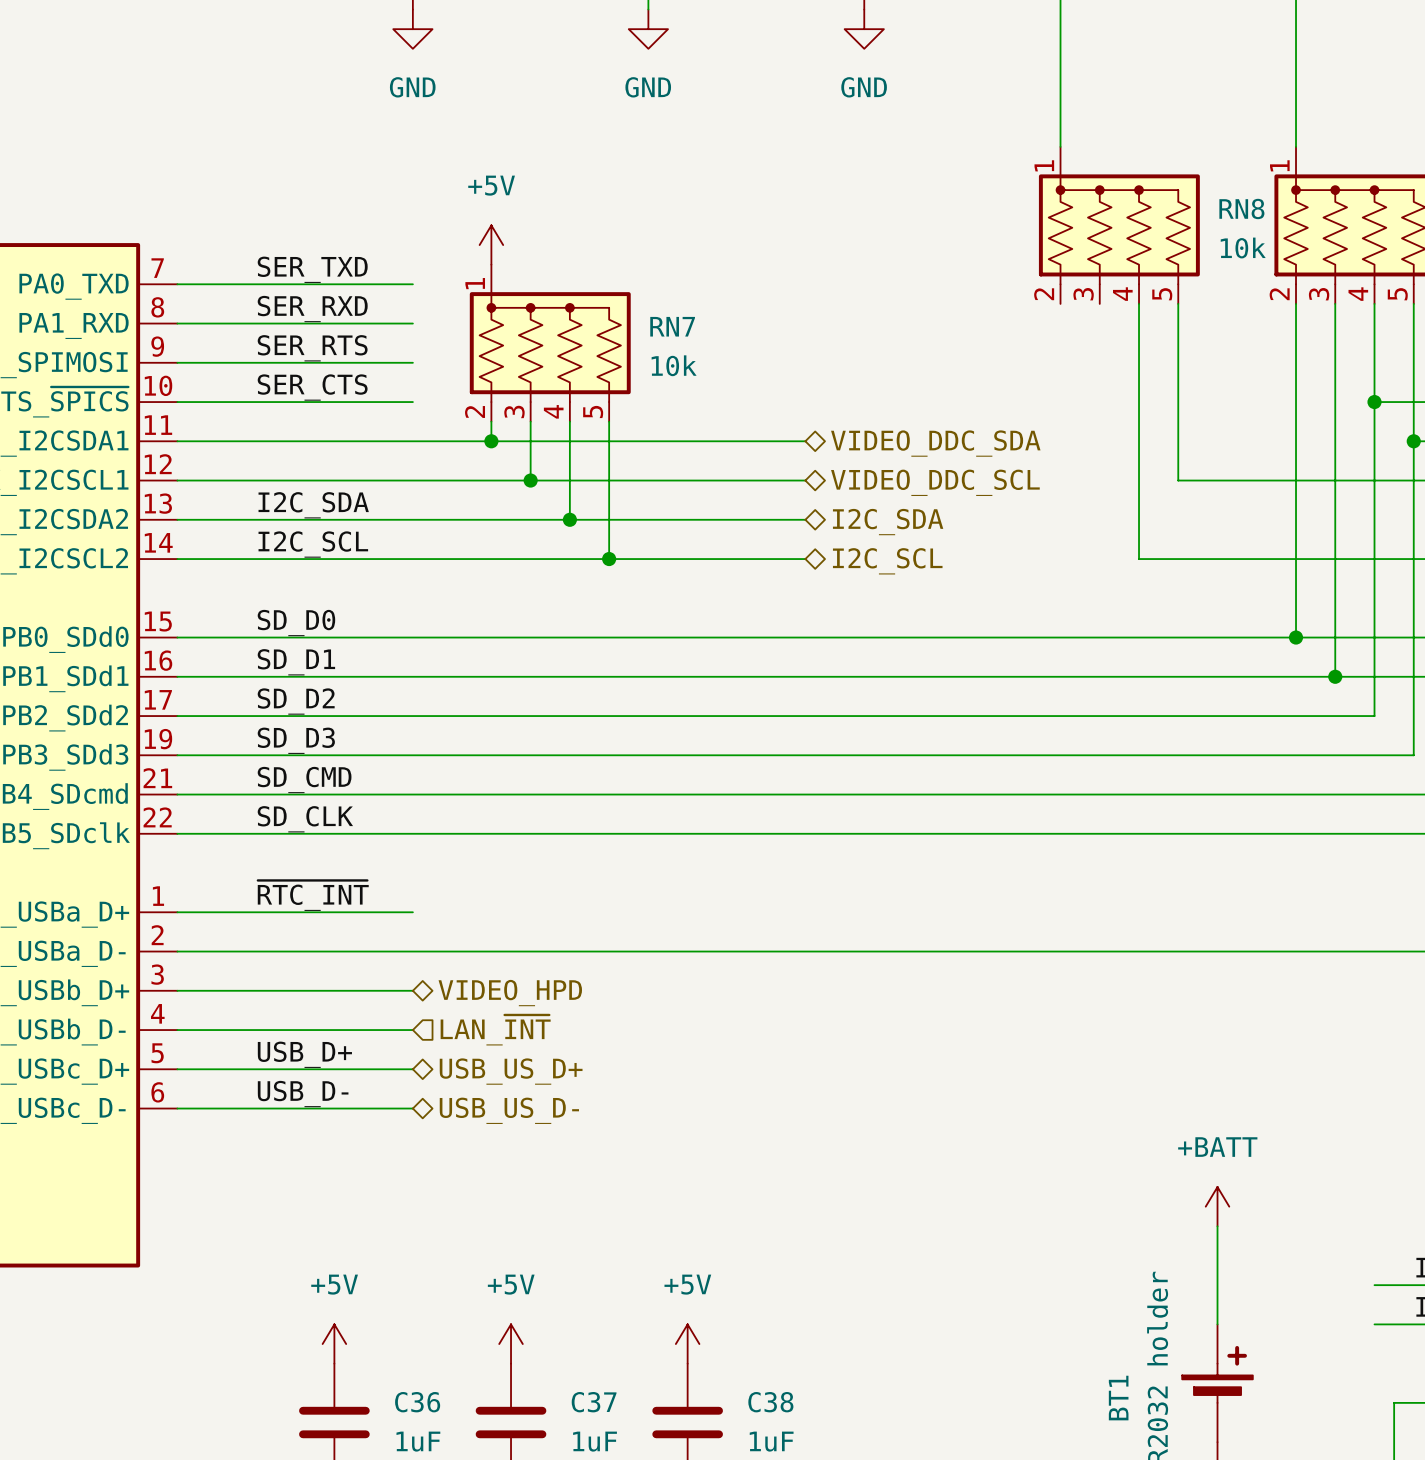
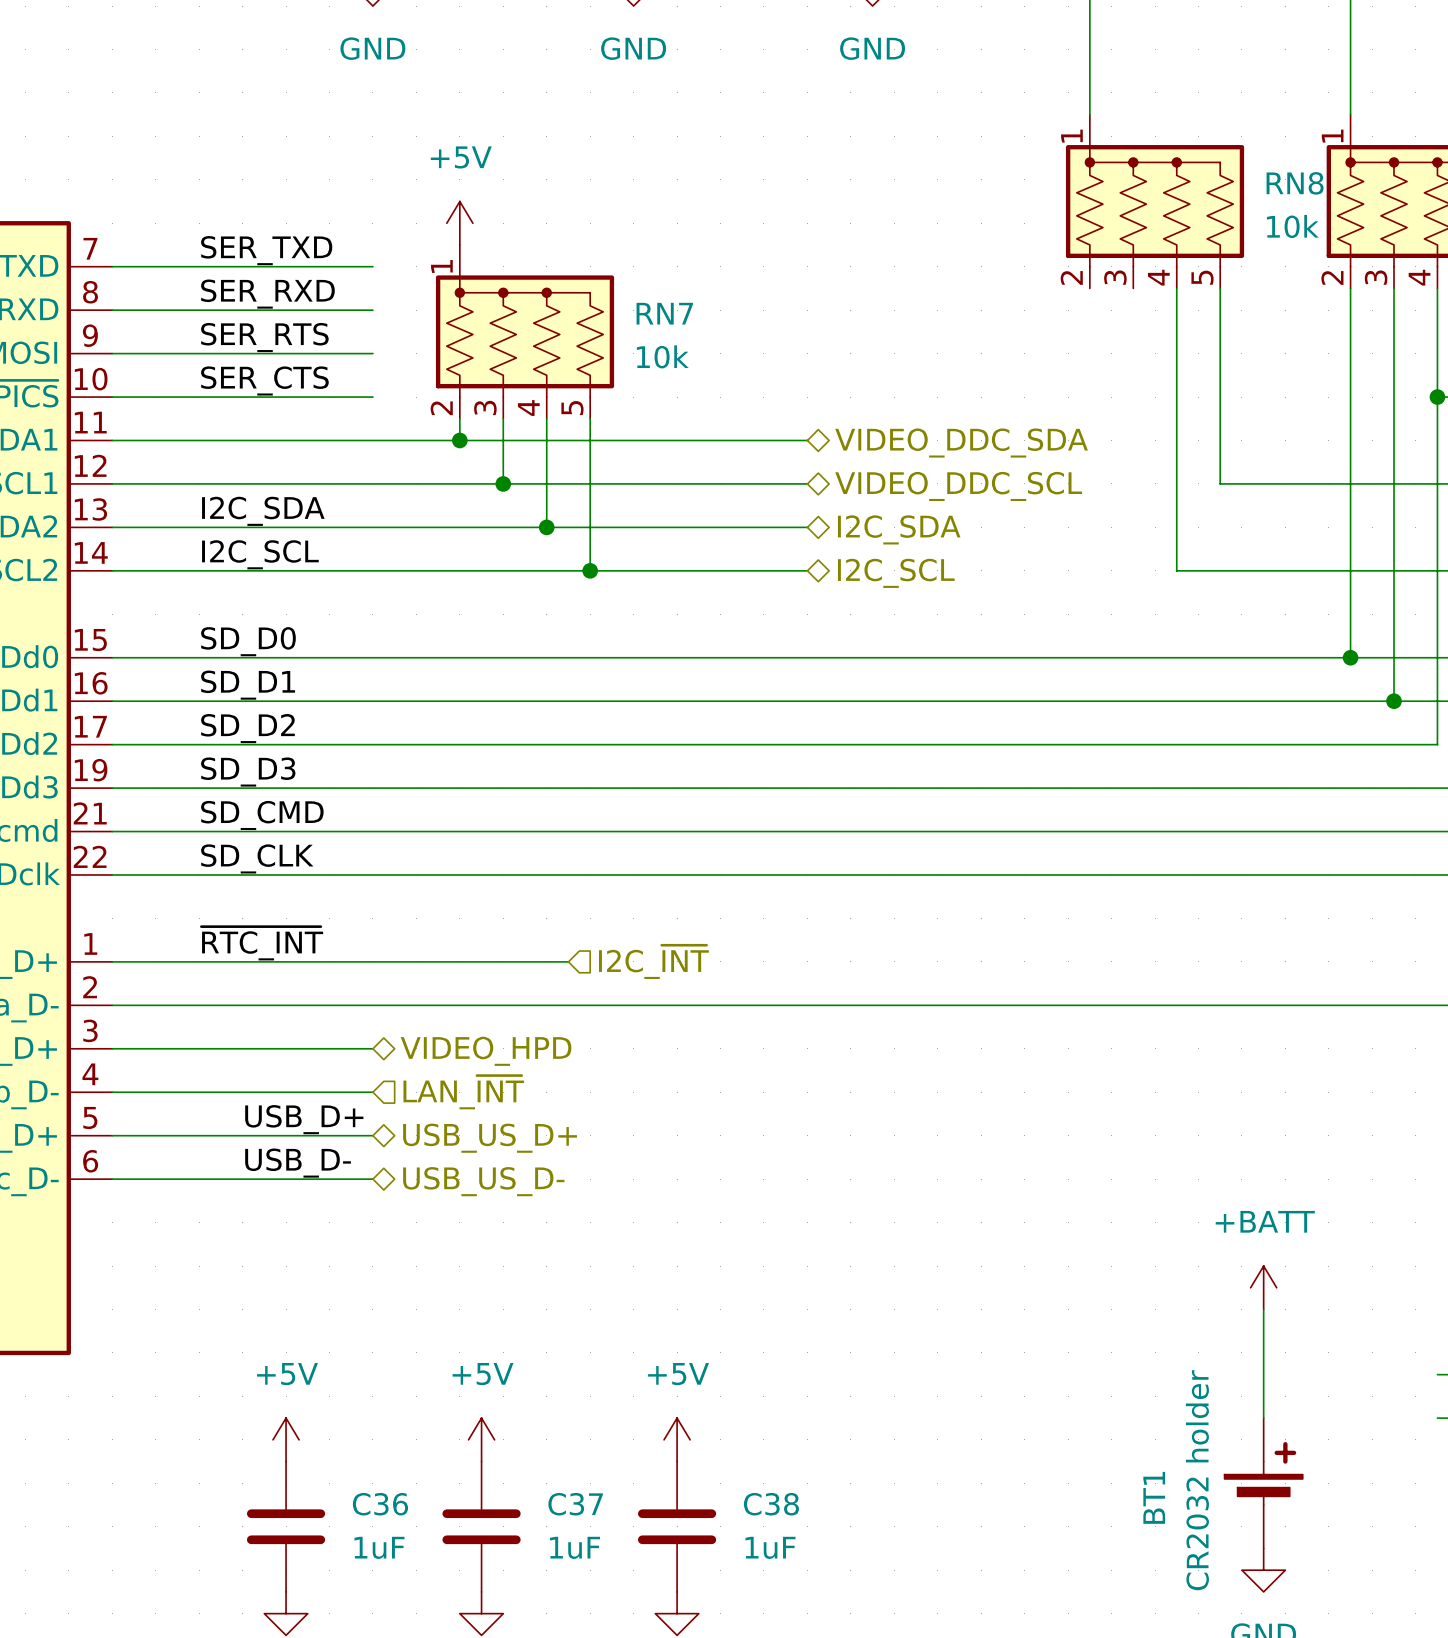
wire: none -> (372, 961) (568, 961)
hierarchical label: none -> I2C_~{INT} (653, 962)
label position: USB_D+ (304, 1054) -> USB_D+ (304, 1119)
label position: USB_D- (303, 1094) -> USB_D- (298, 1163)

